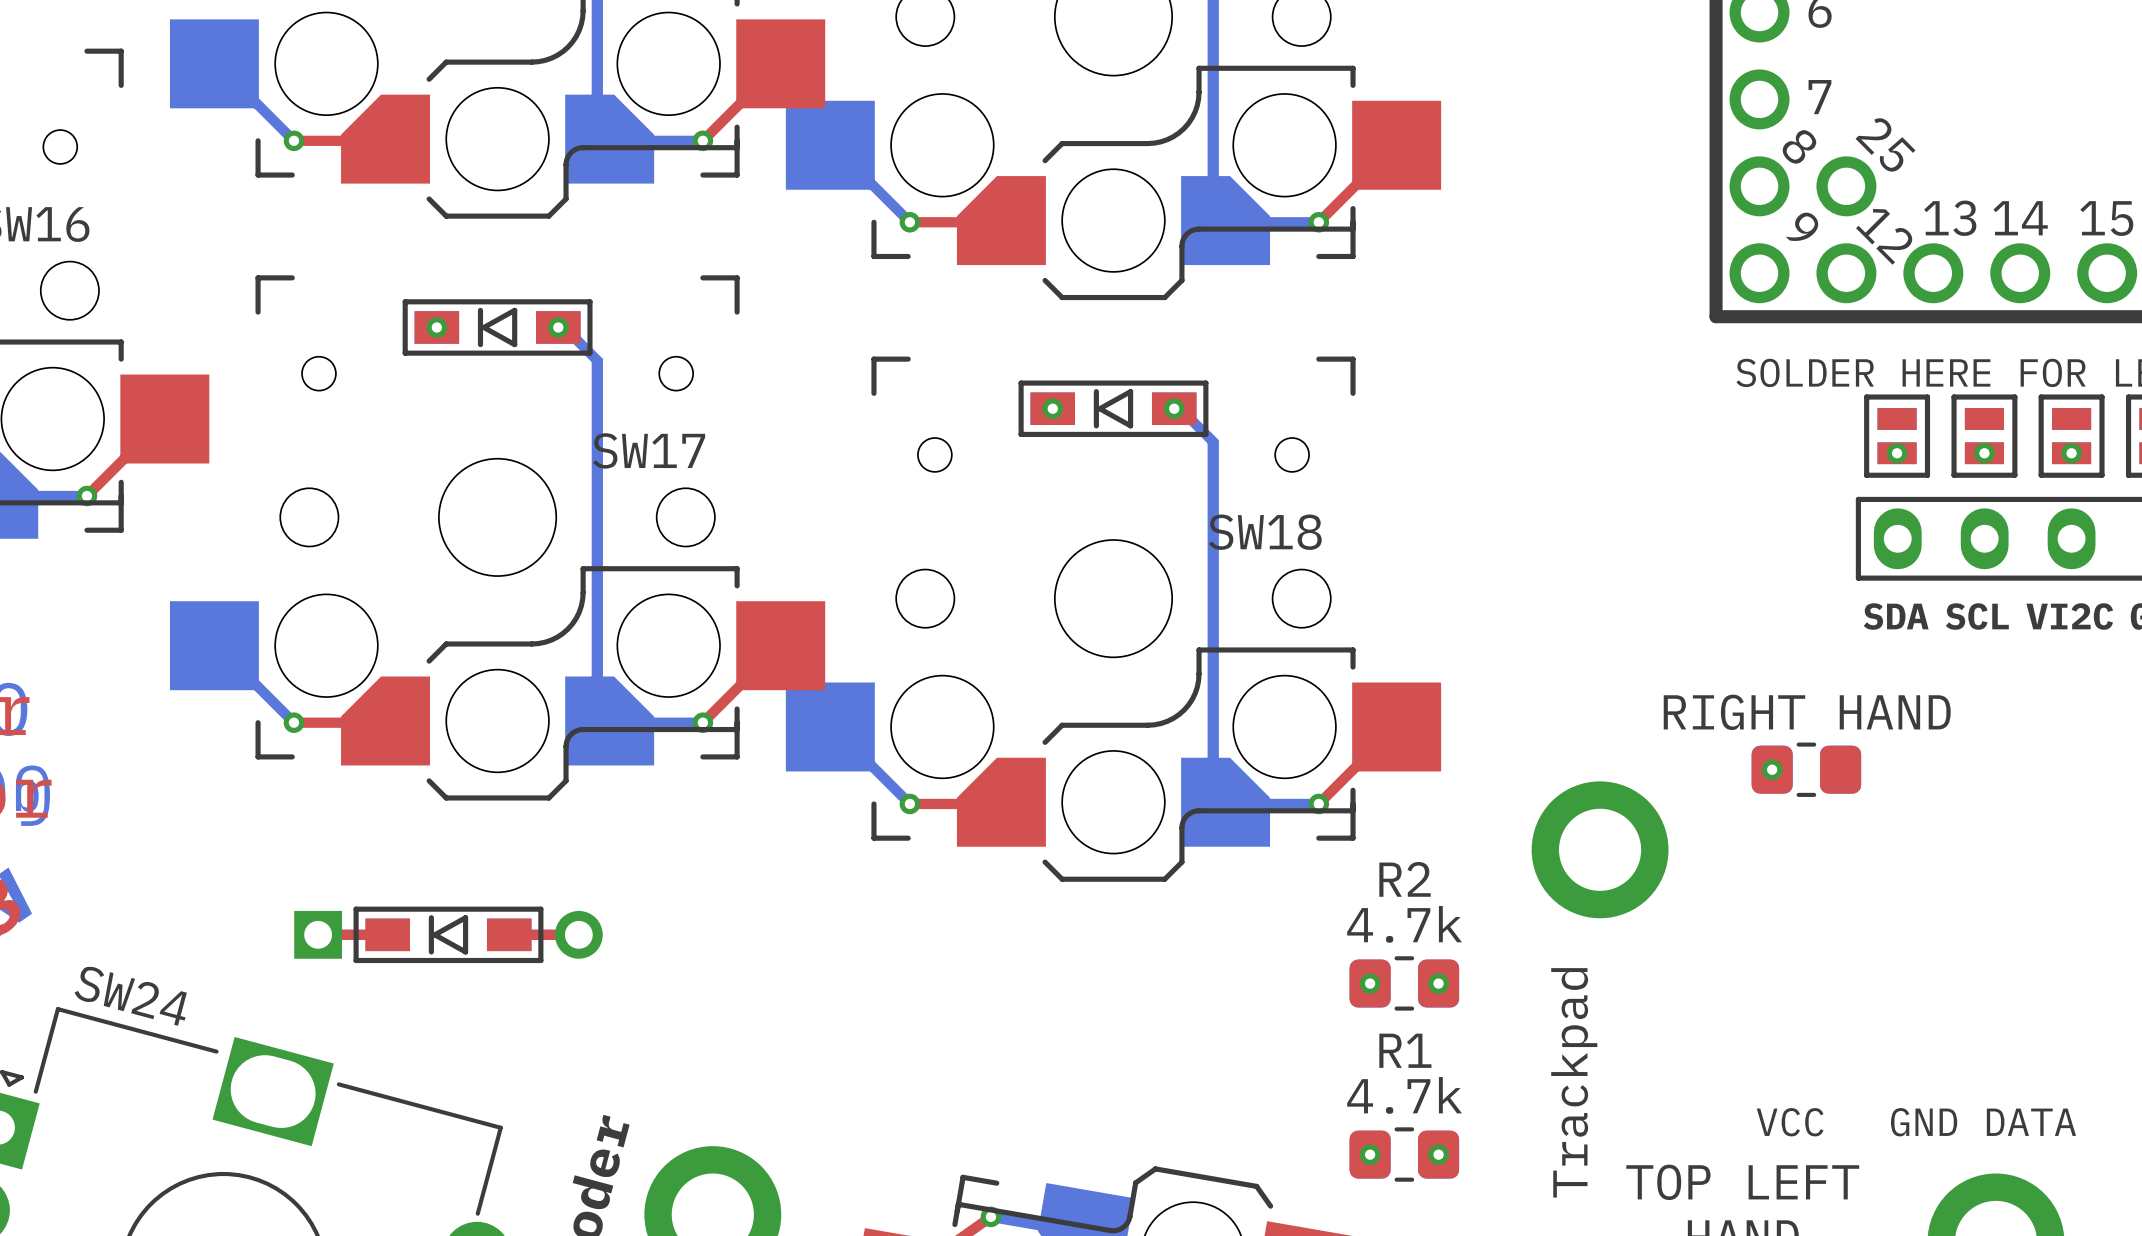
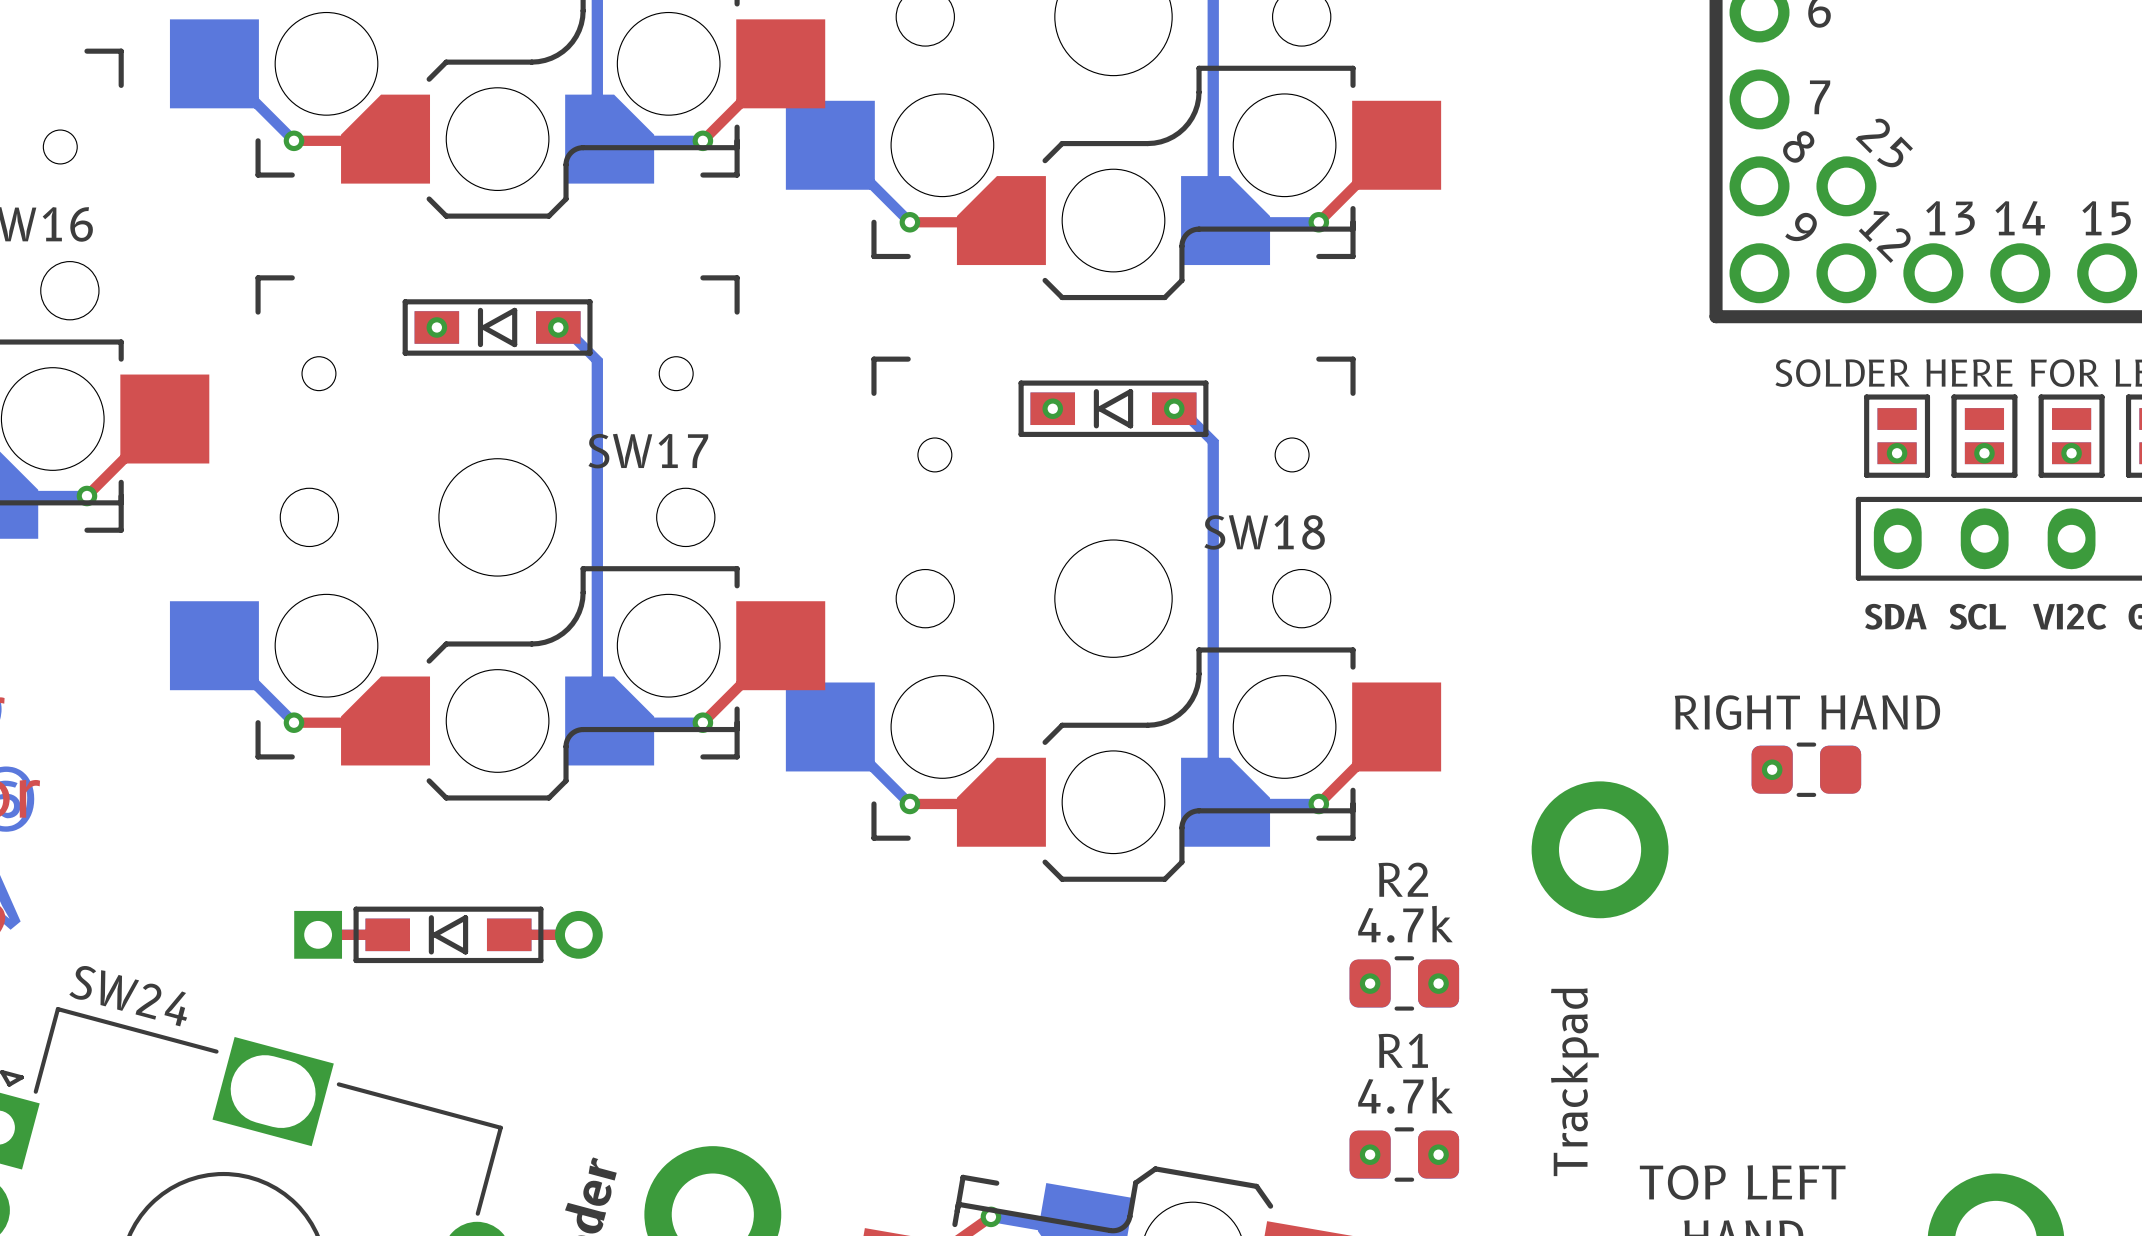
text: VCC (1790, 1122) -> none
text: GND (1924, 1122) -> none
text: DATA (2031, 1122) -> none

